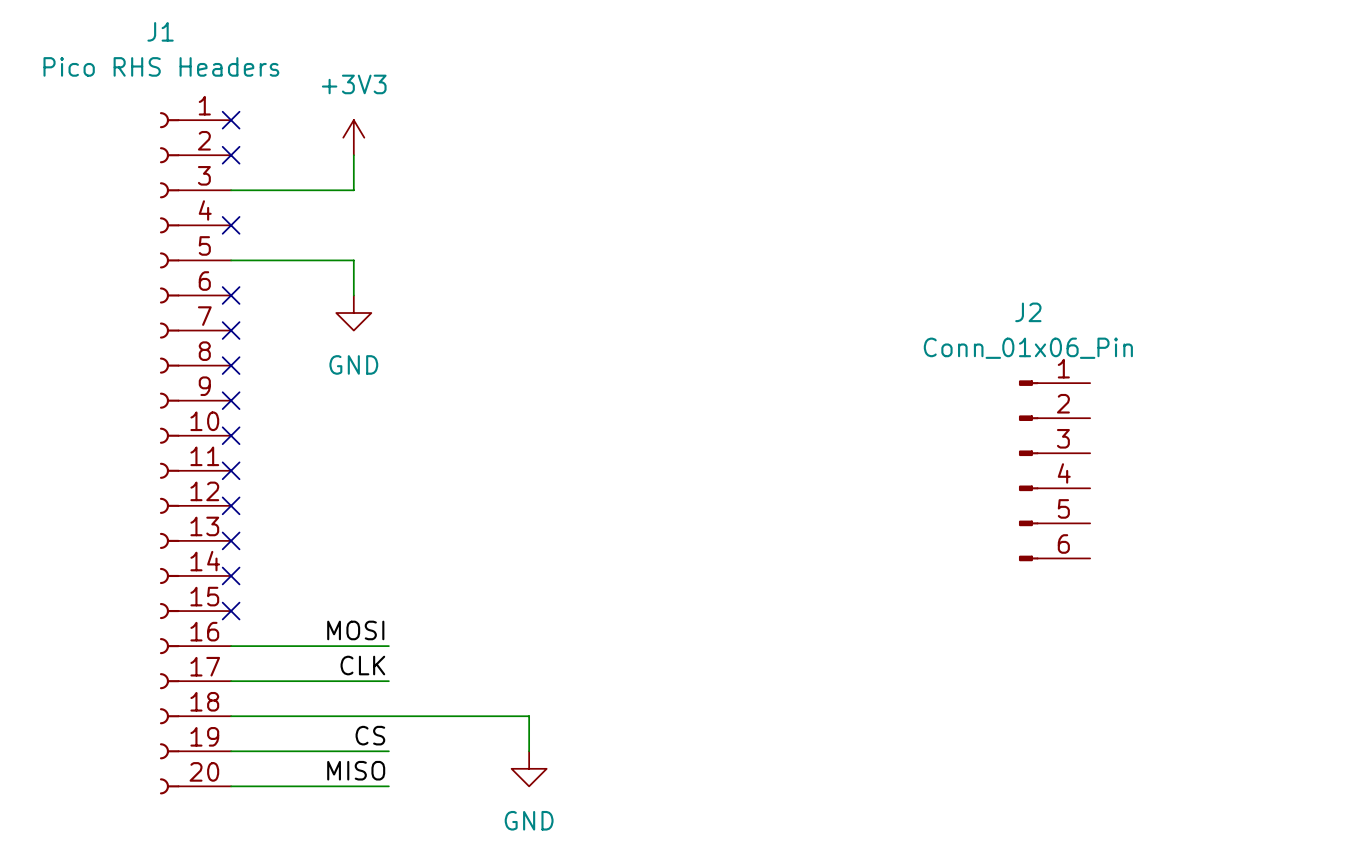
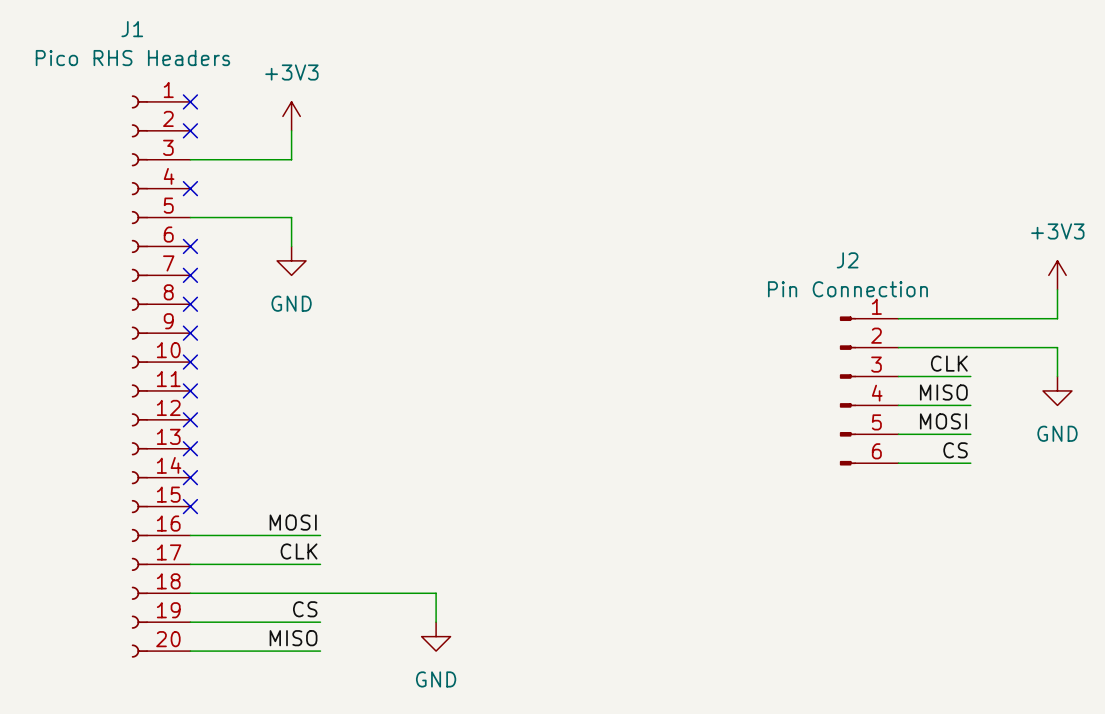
power symbol: none -> +3V3 (1057, 275)
J2 value: Conn_01x06_Pin (1028, 348) -> Pin Connection (847, 289)
wire: none -> (1057, 289) (1057, 318) (898, 318)
wire: none -> (898, 347) (1057, 347) (1057, 376)
label: none -> CLK (949, 363)
wire: none -> (898, 376) (970, 376)
power symbol: none -> GND (1057, 390)
label: none -> MISO (943, 392)
wire: none -> (898, 405) (970, 405)
label: none -> MOSI (943, 421)
wire: none -> (898, 434) (970, 434)
label: none -> CS (955, 450)
wire: none -> (898, 463) (970, 463)

